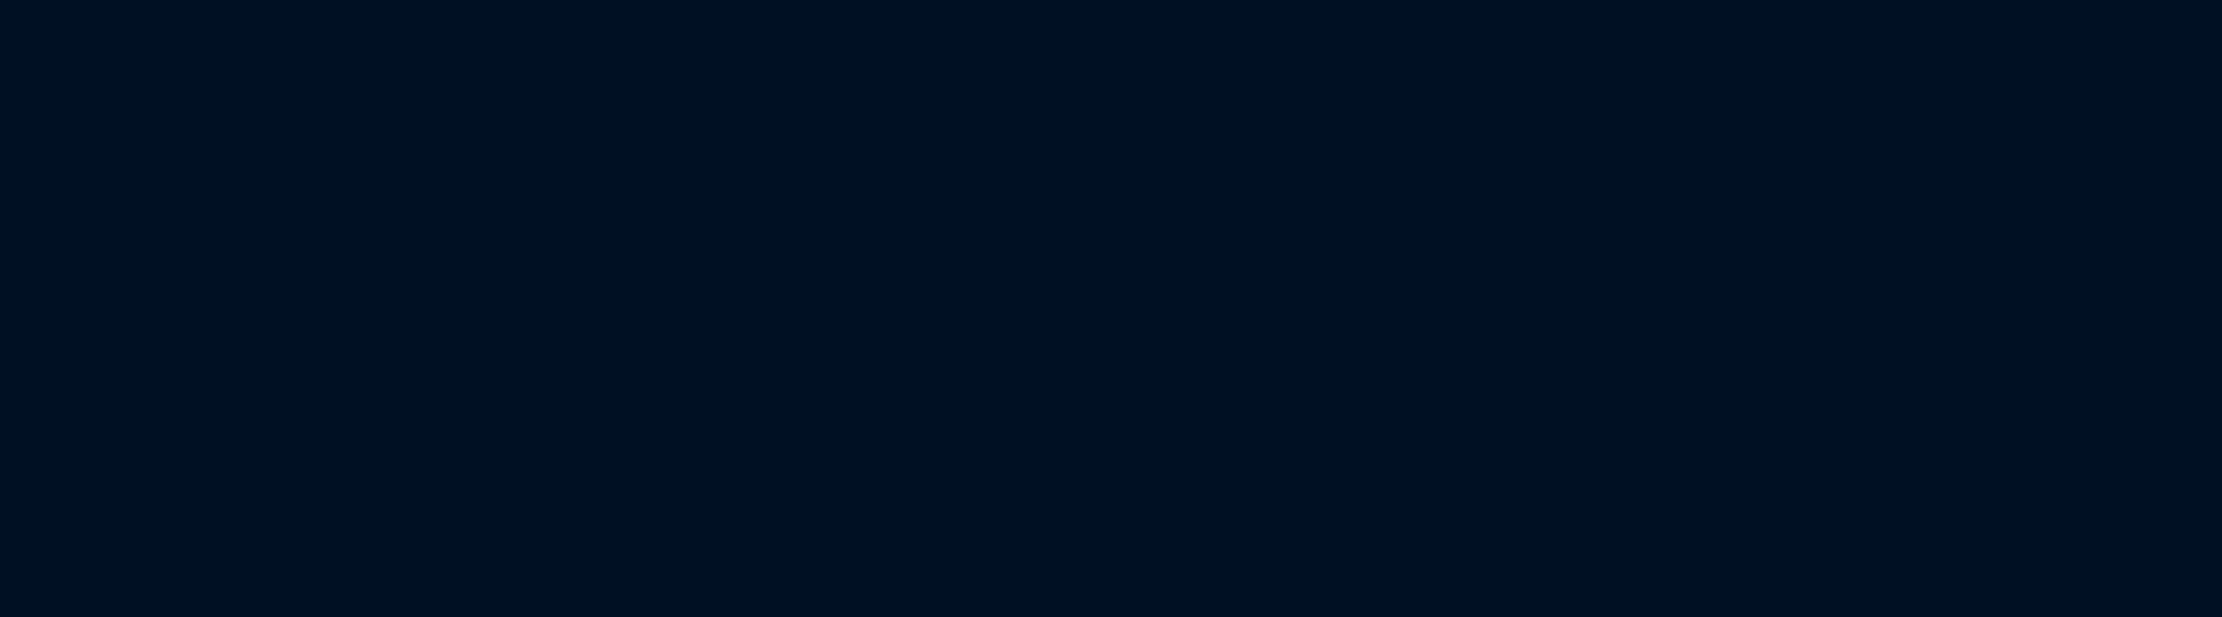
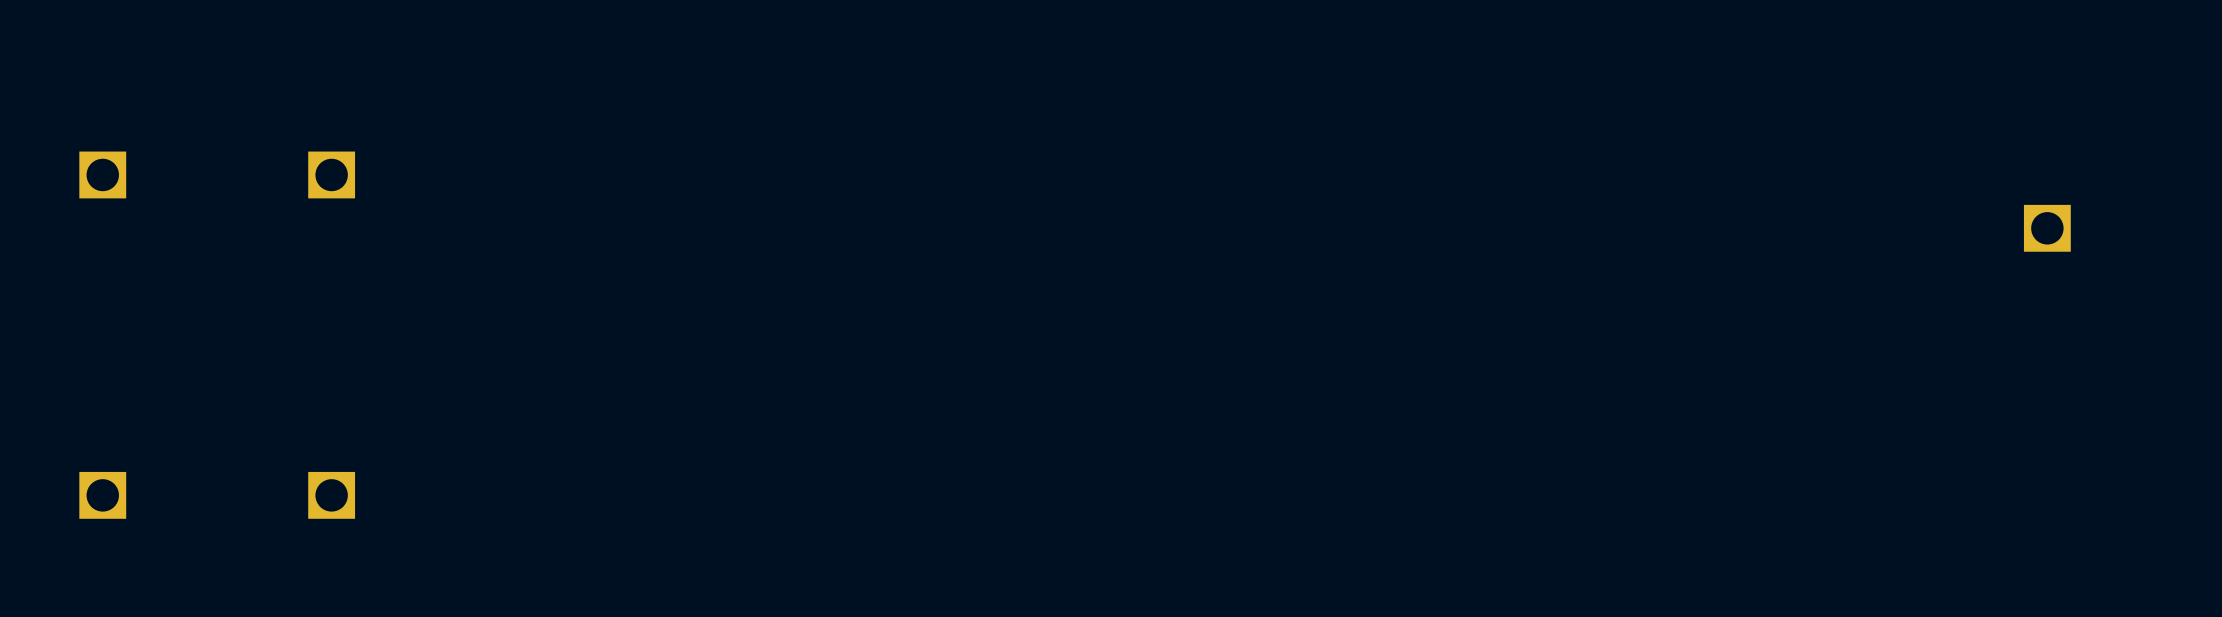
part: none -> (102, 174)
part: none -> (331, 174)
part: none -> (2047, 228)
part: none -> (102, 495)
part: none -> (331, 495)

